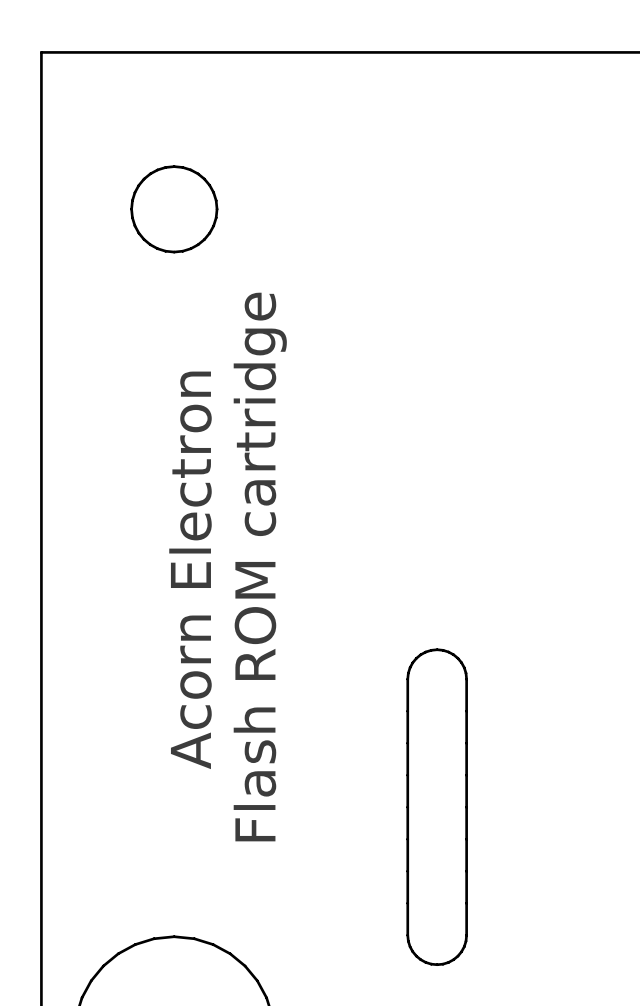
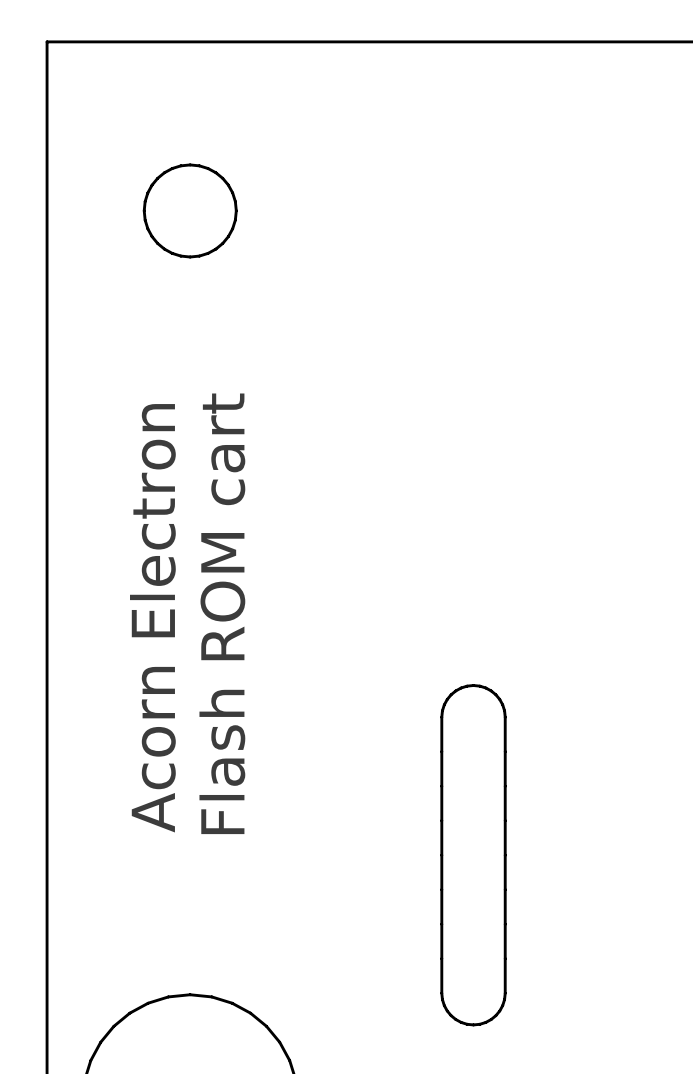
text: Flash ROM cartridge (260, 567) -> Flash ROM cart (222, 613)
text position: Acorn Electron (190, 570) -> Acorn Electron (152, 618)

